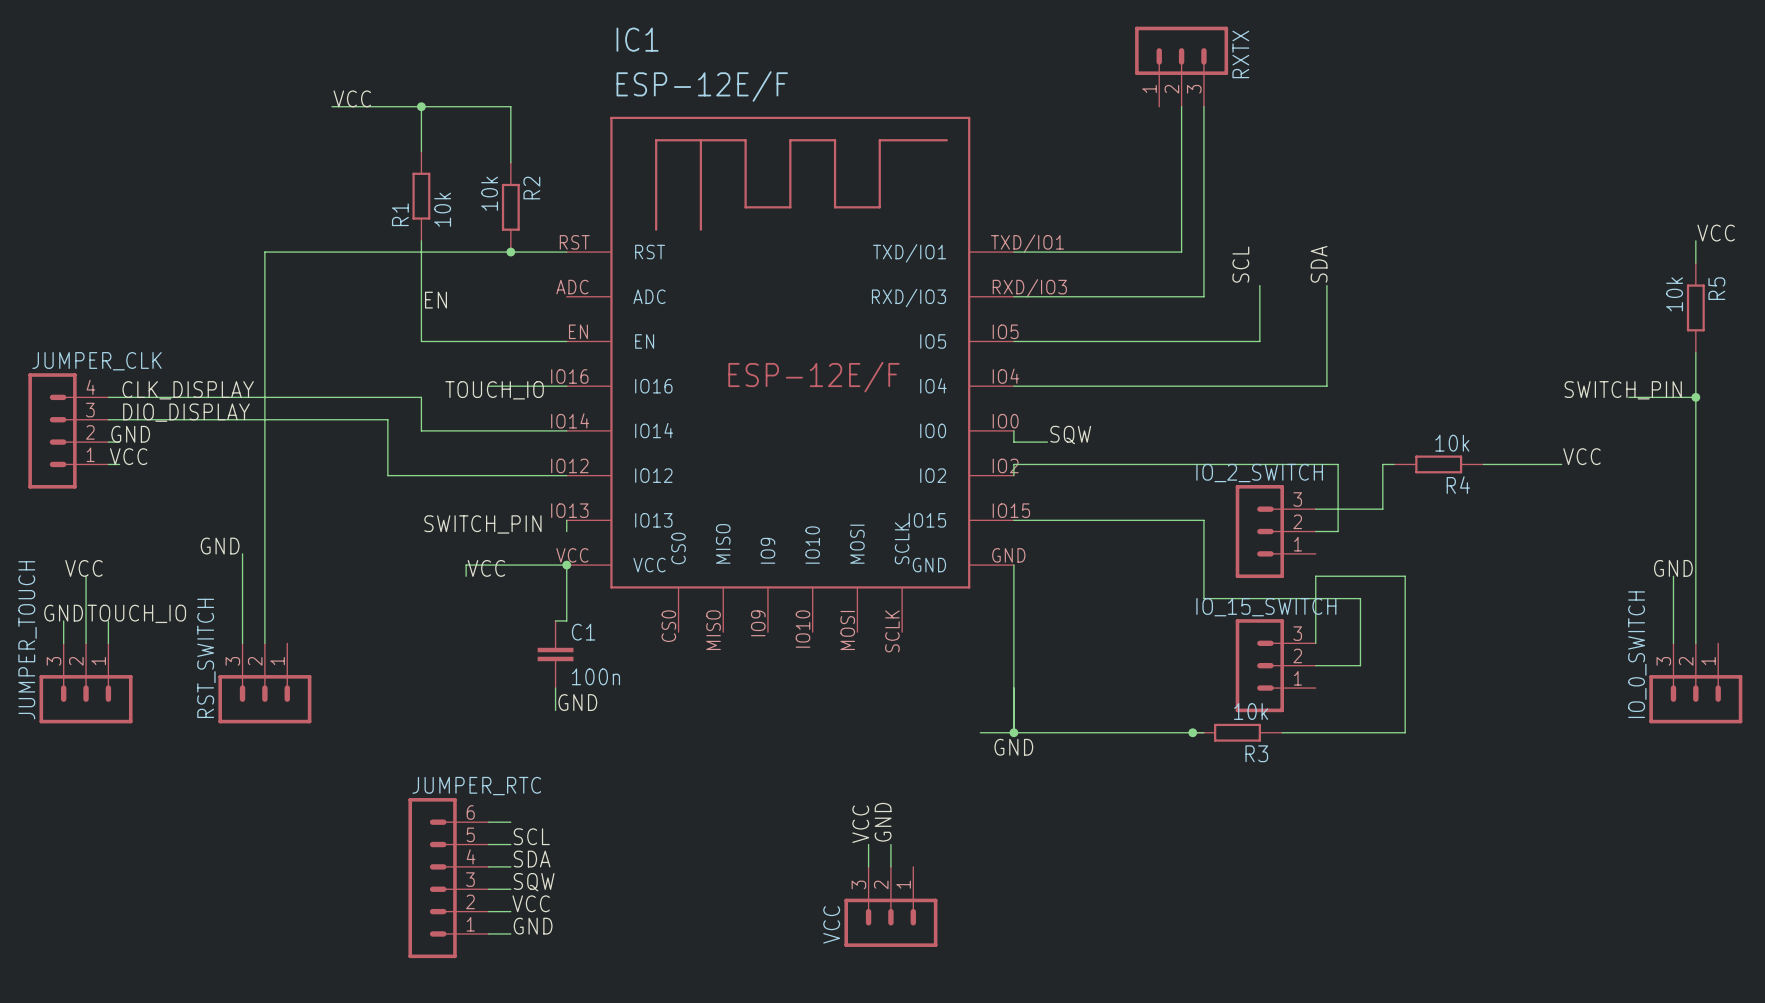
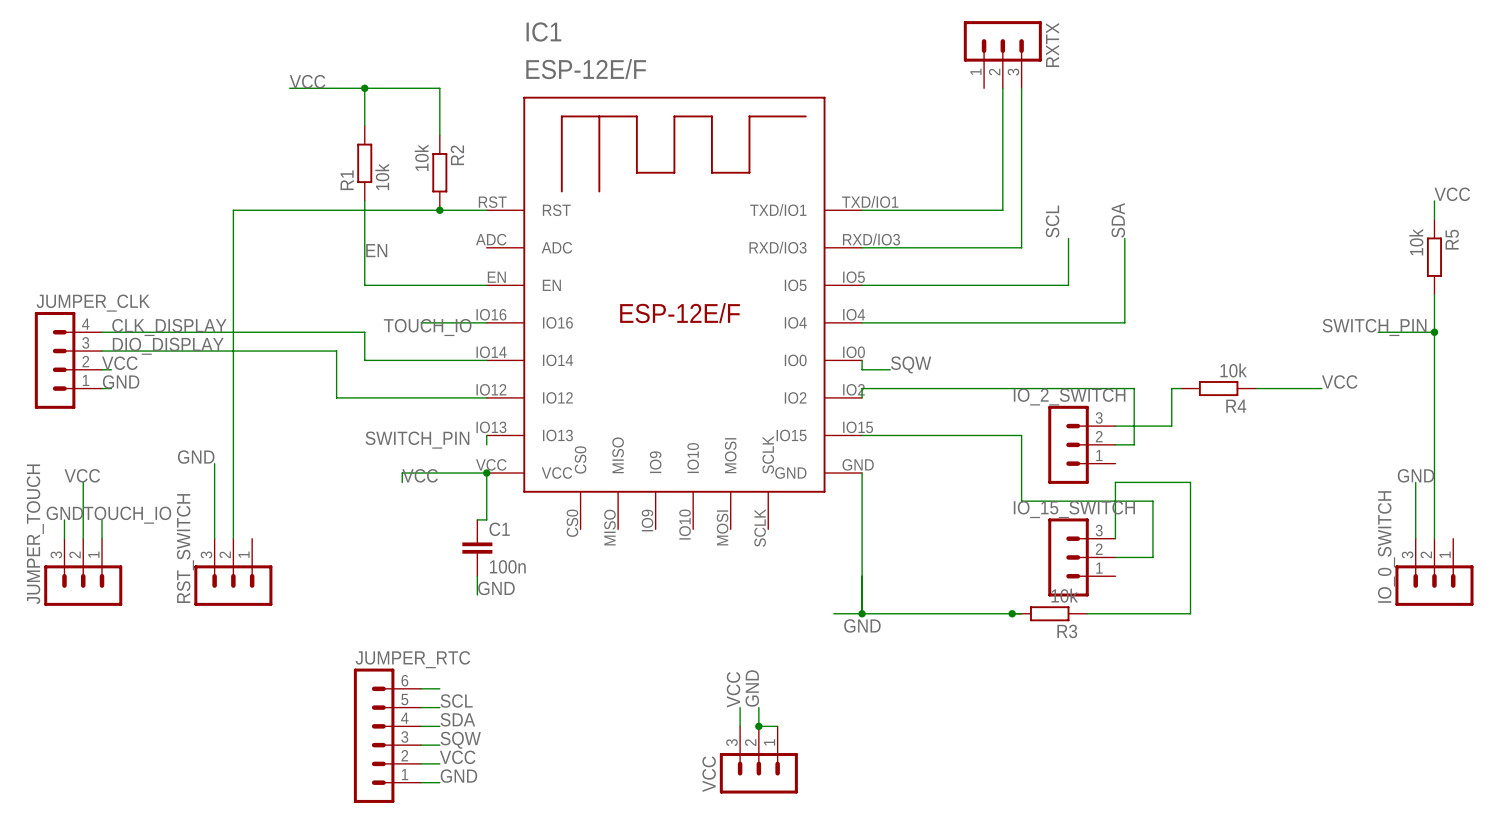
label: GND (130, 434) -> VCC (119, 363)
label: VCC (128, 456) -> GND (121, 381)
wire: none -> (758, 726) (777, 726)
junction: none -> (758, 726)

